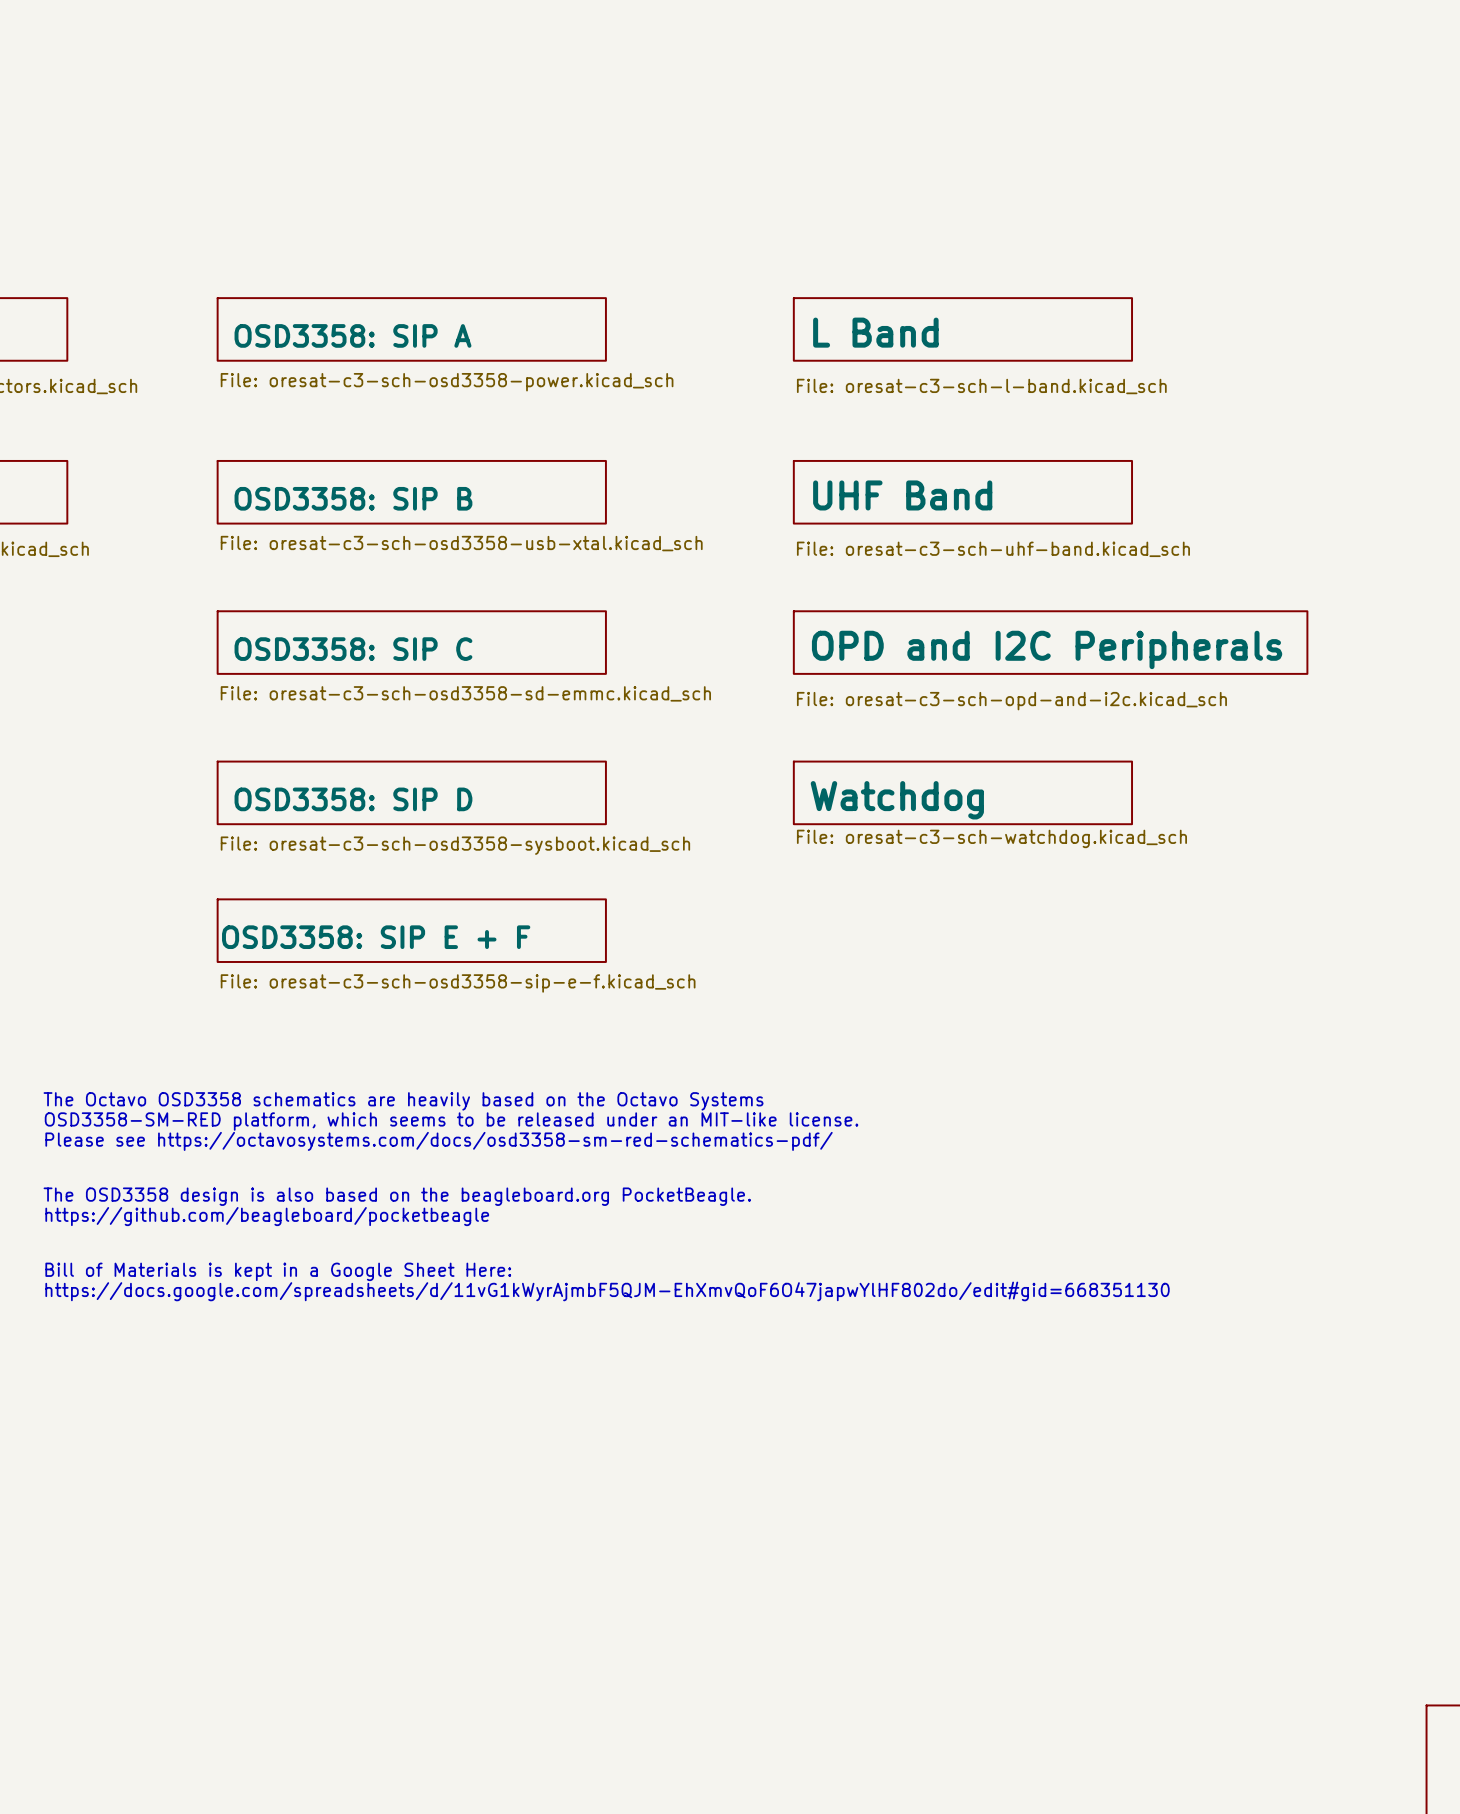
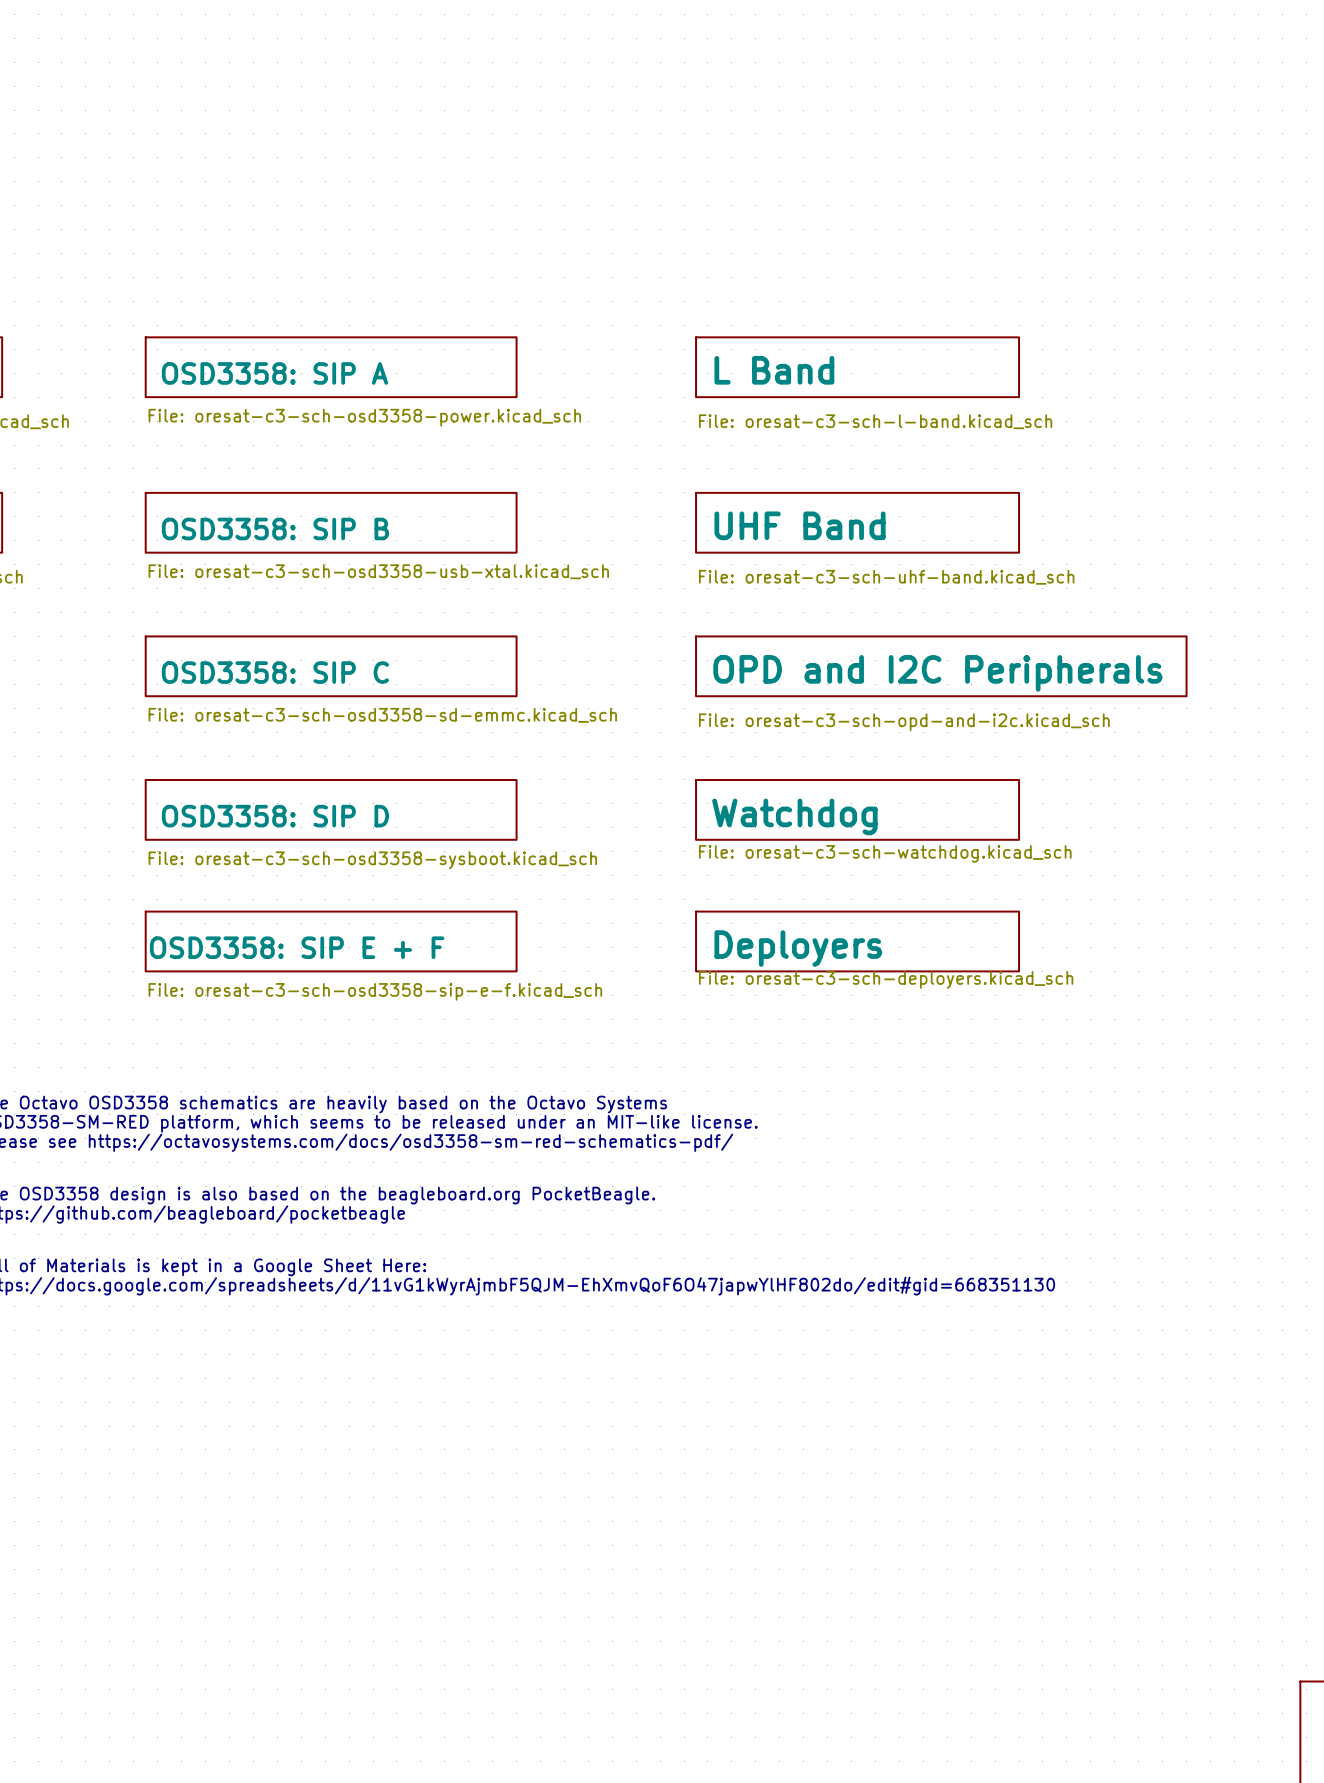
sheet Deployers: none -> File: oresat-c3-sch-deployers.kicad_sch (857, 941)

